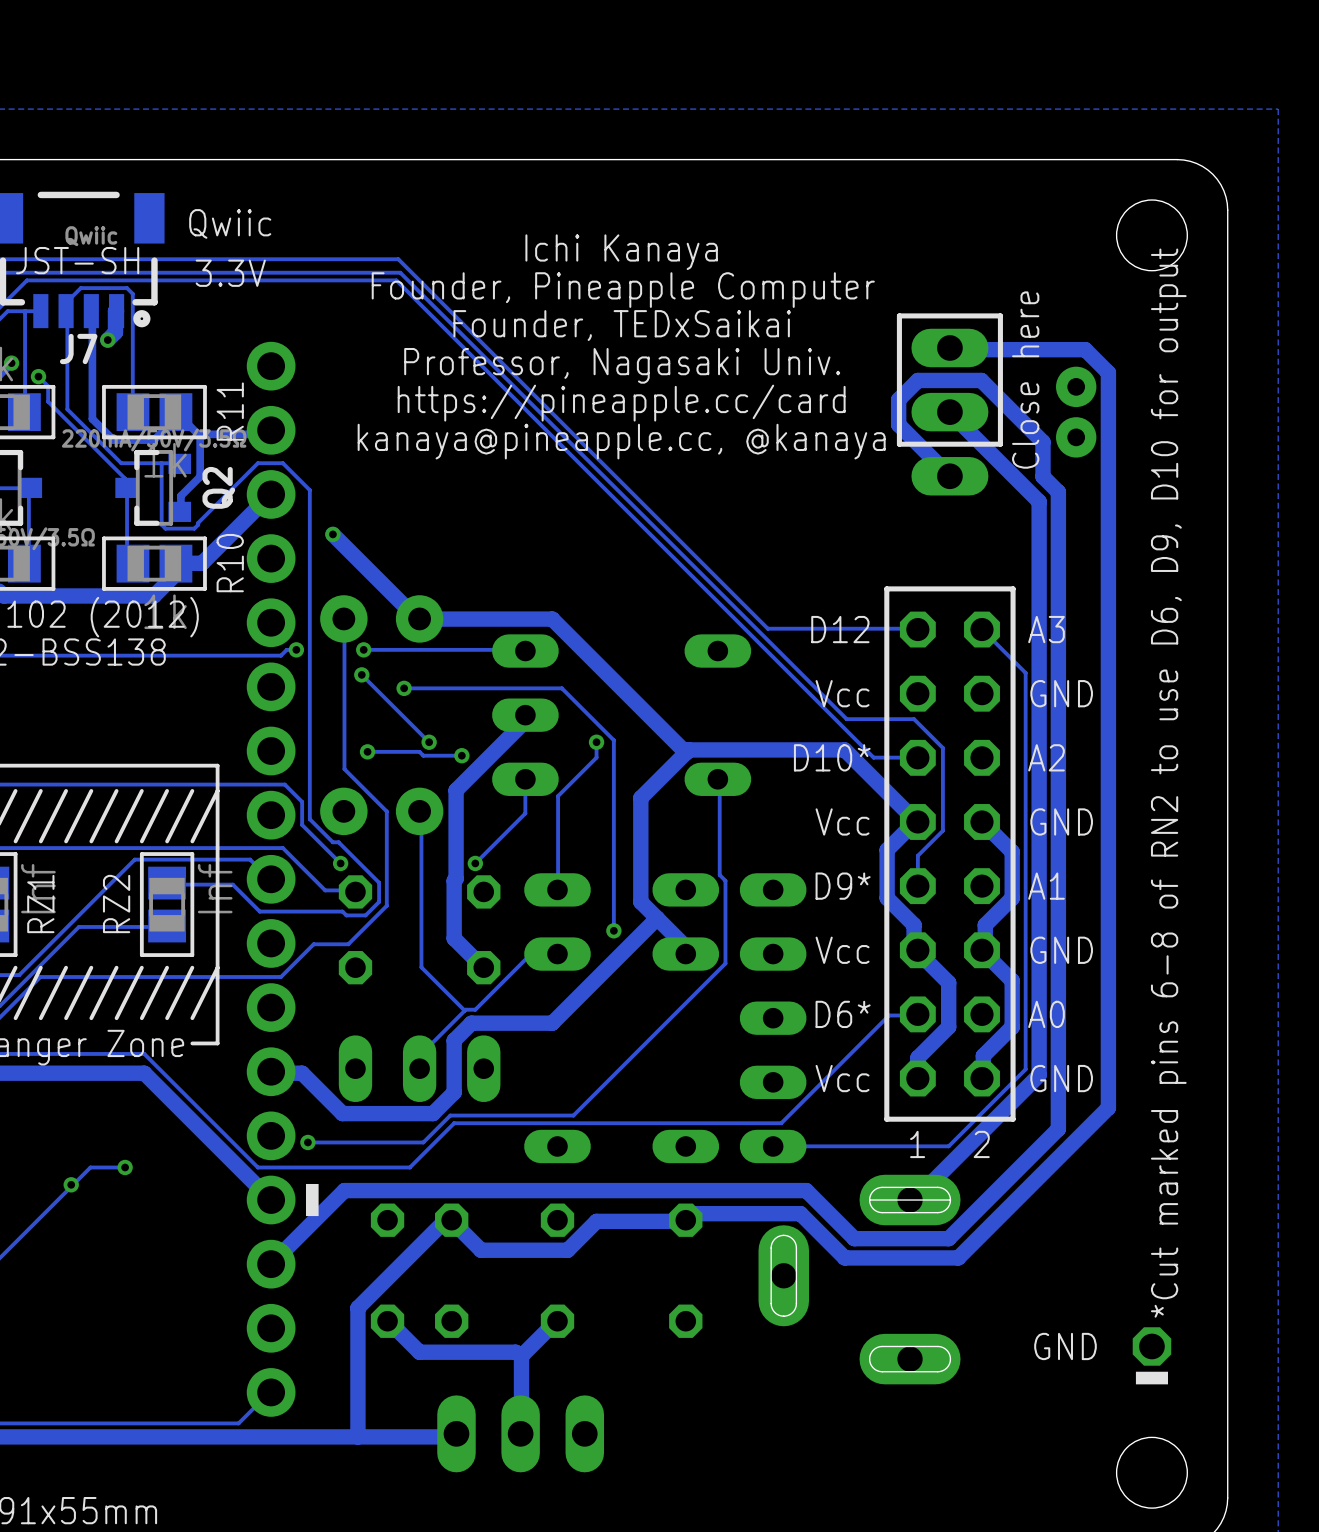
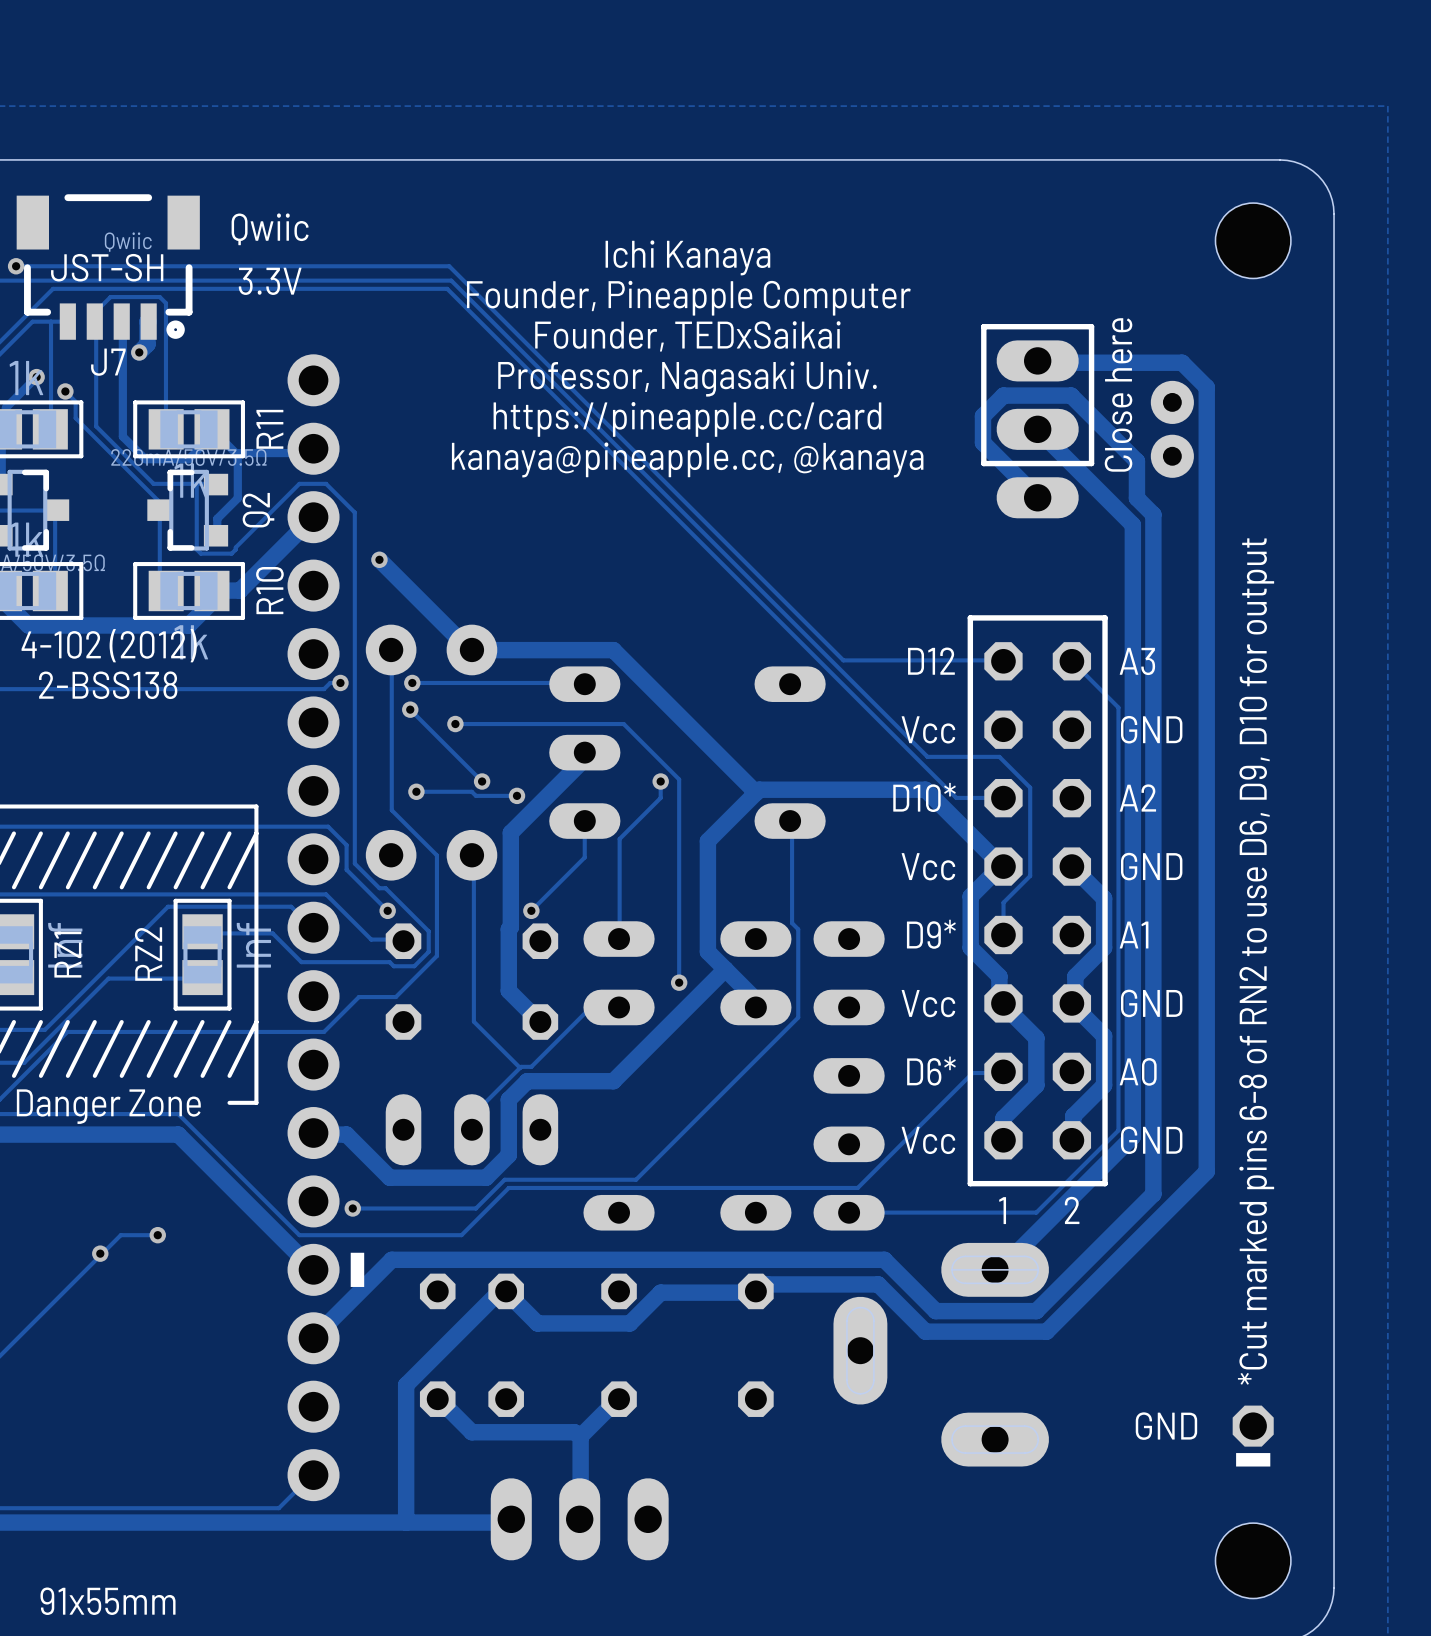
text position: *Cut marked pins 6-8 of RN2 to use D6, D9, D10 for output (1168, 783) -> *Cut marked pins 6-8 of RN2 to use D6, D9, D10 for output (1256, 961)

